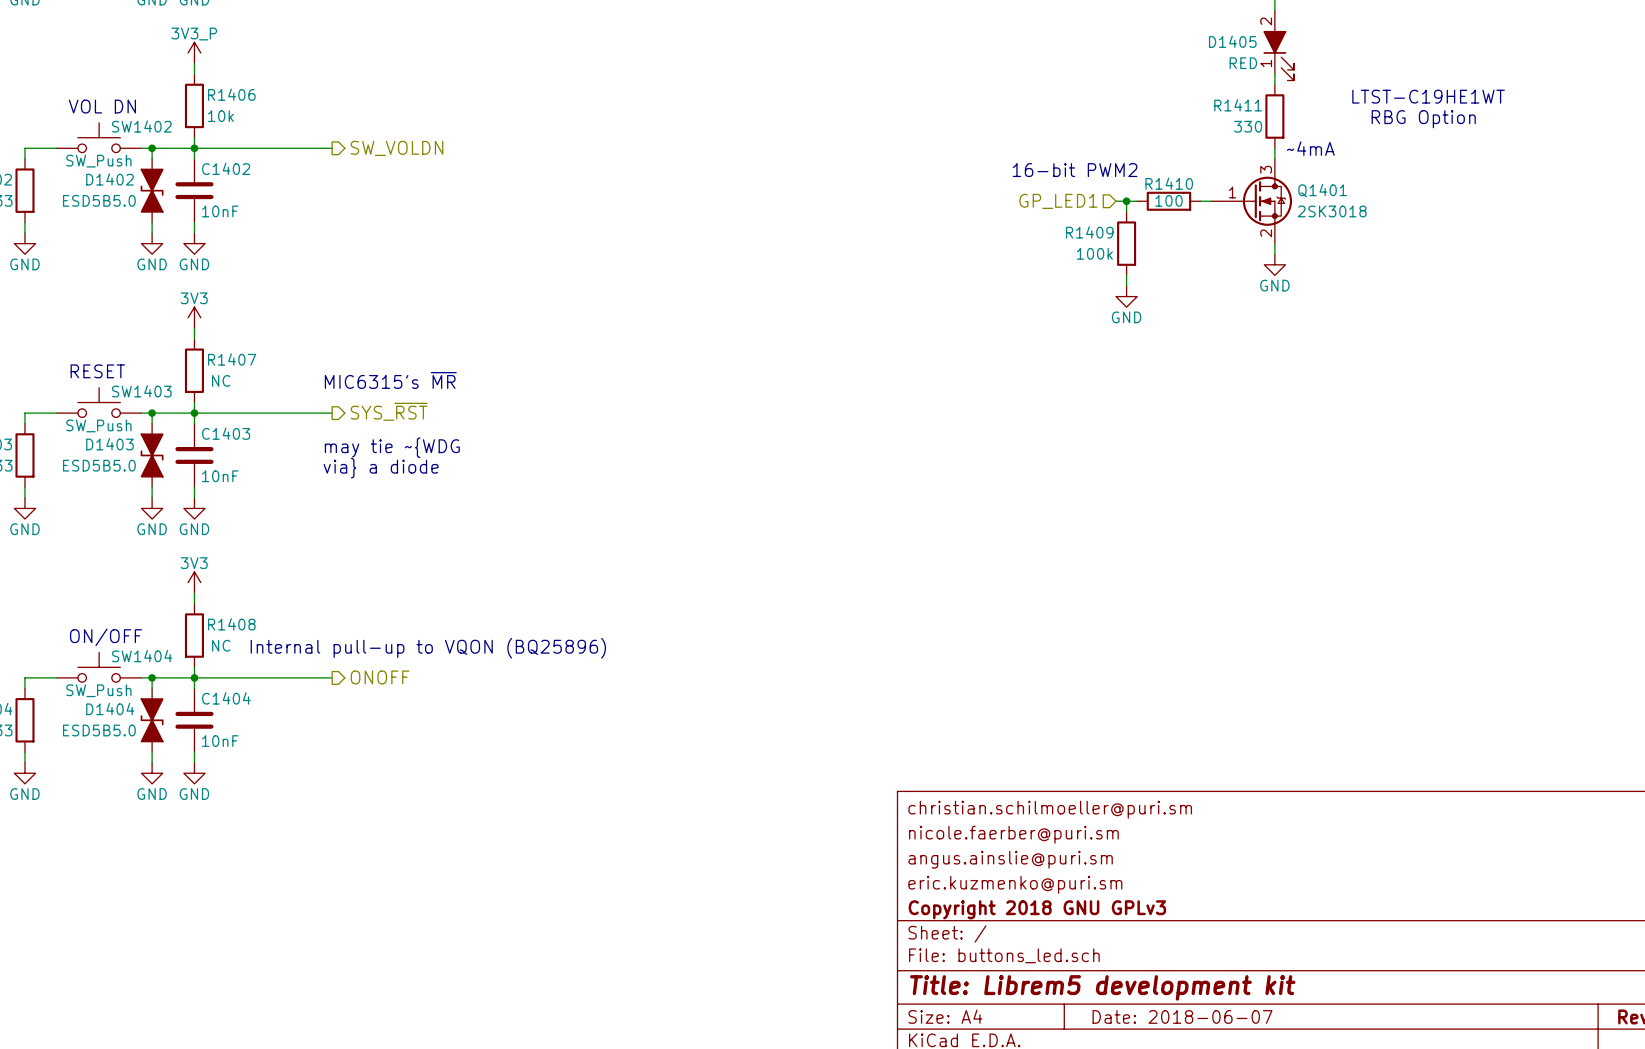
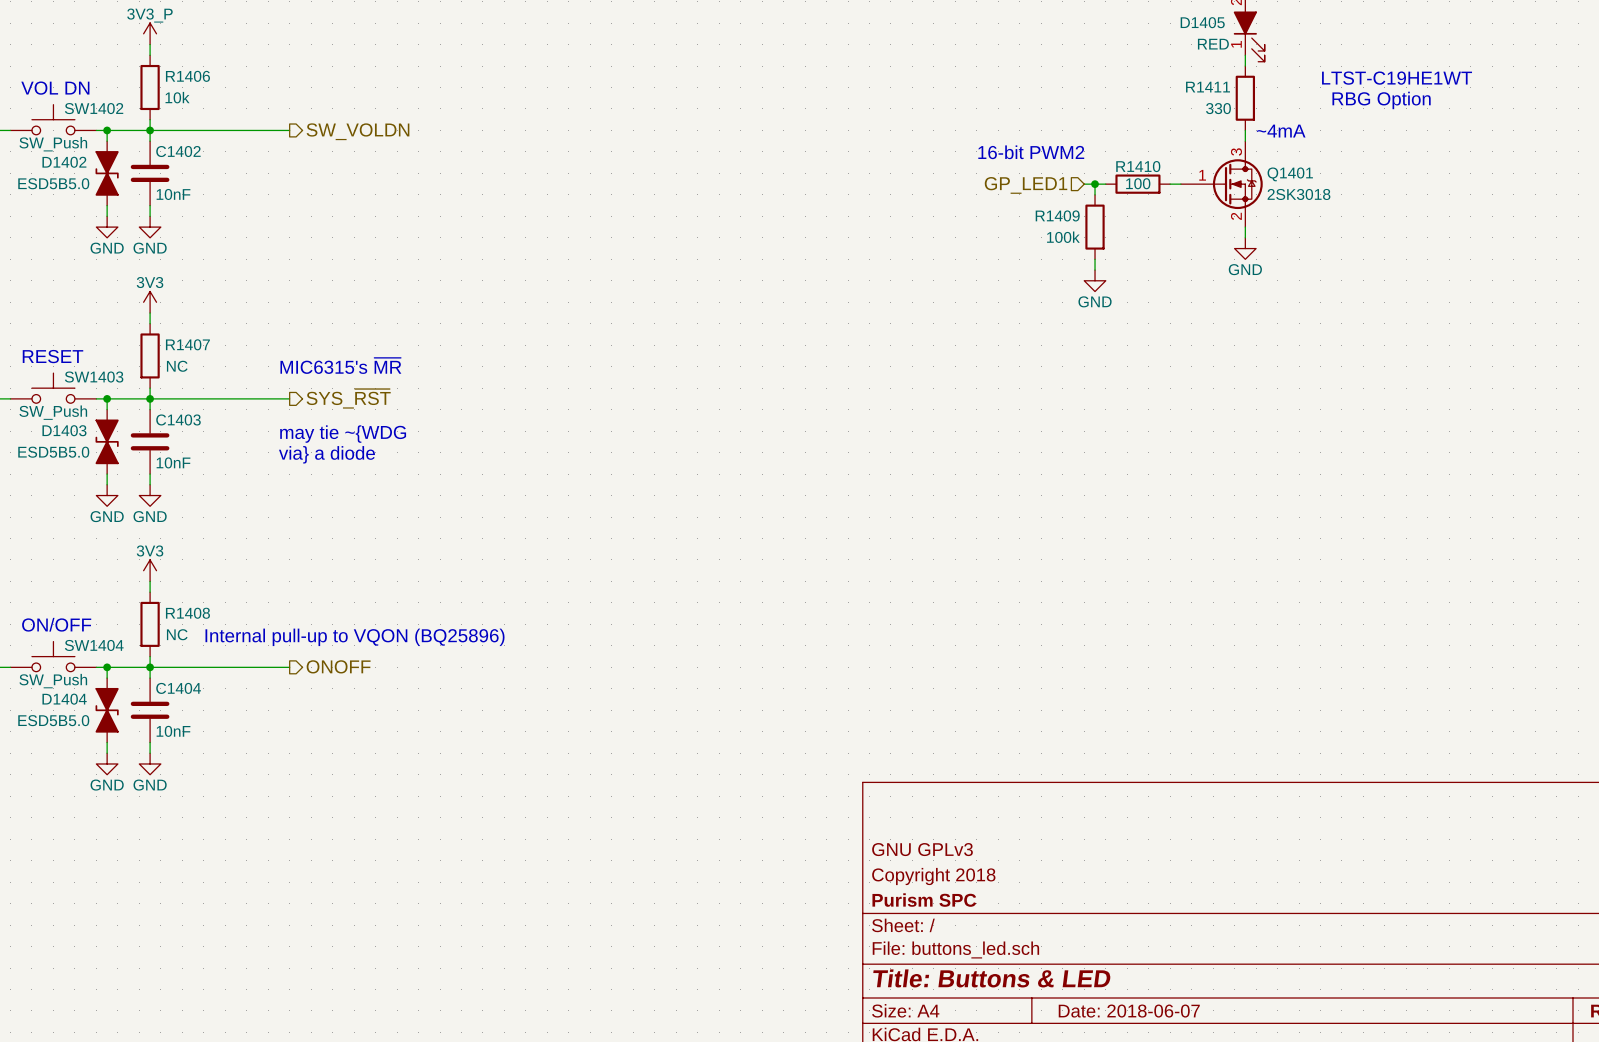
title block: christian.schilmoeller@puri.sm (1050, 809) -> none
title block: nicole.faerber@puri.sm (1013, 834) -> none
title block: angus.ainslie@puri.sm (1010, 859) -> GNU GPLv3 (922, 849)
title block: eric.kuzmenko@puri.sm (1015, 884) -> Copyright 2018 (933, 876)
title block: Copyright 2018 GNU GPLv3 (1037, 909) -> Purism SPC (924, 900)
title block: Title: Librem5 development kit (1102, 987) -> Title: Buttons & LED (991, 978)

